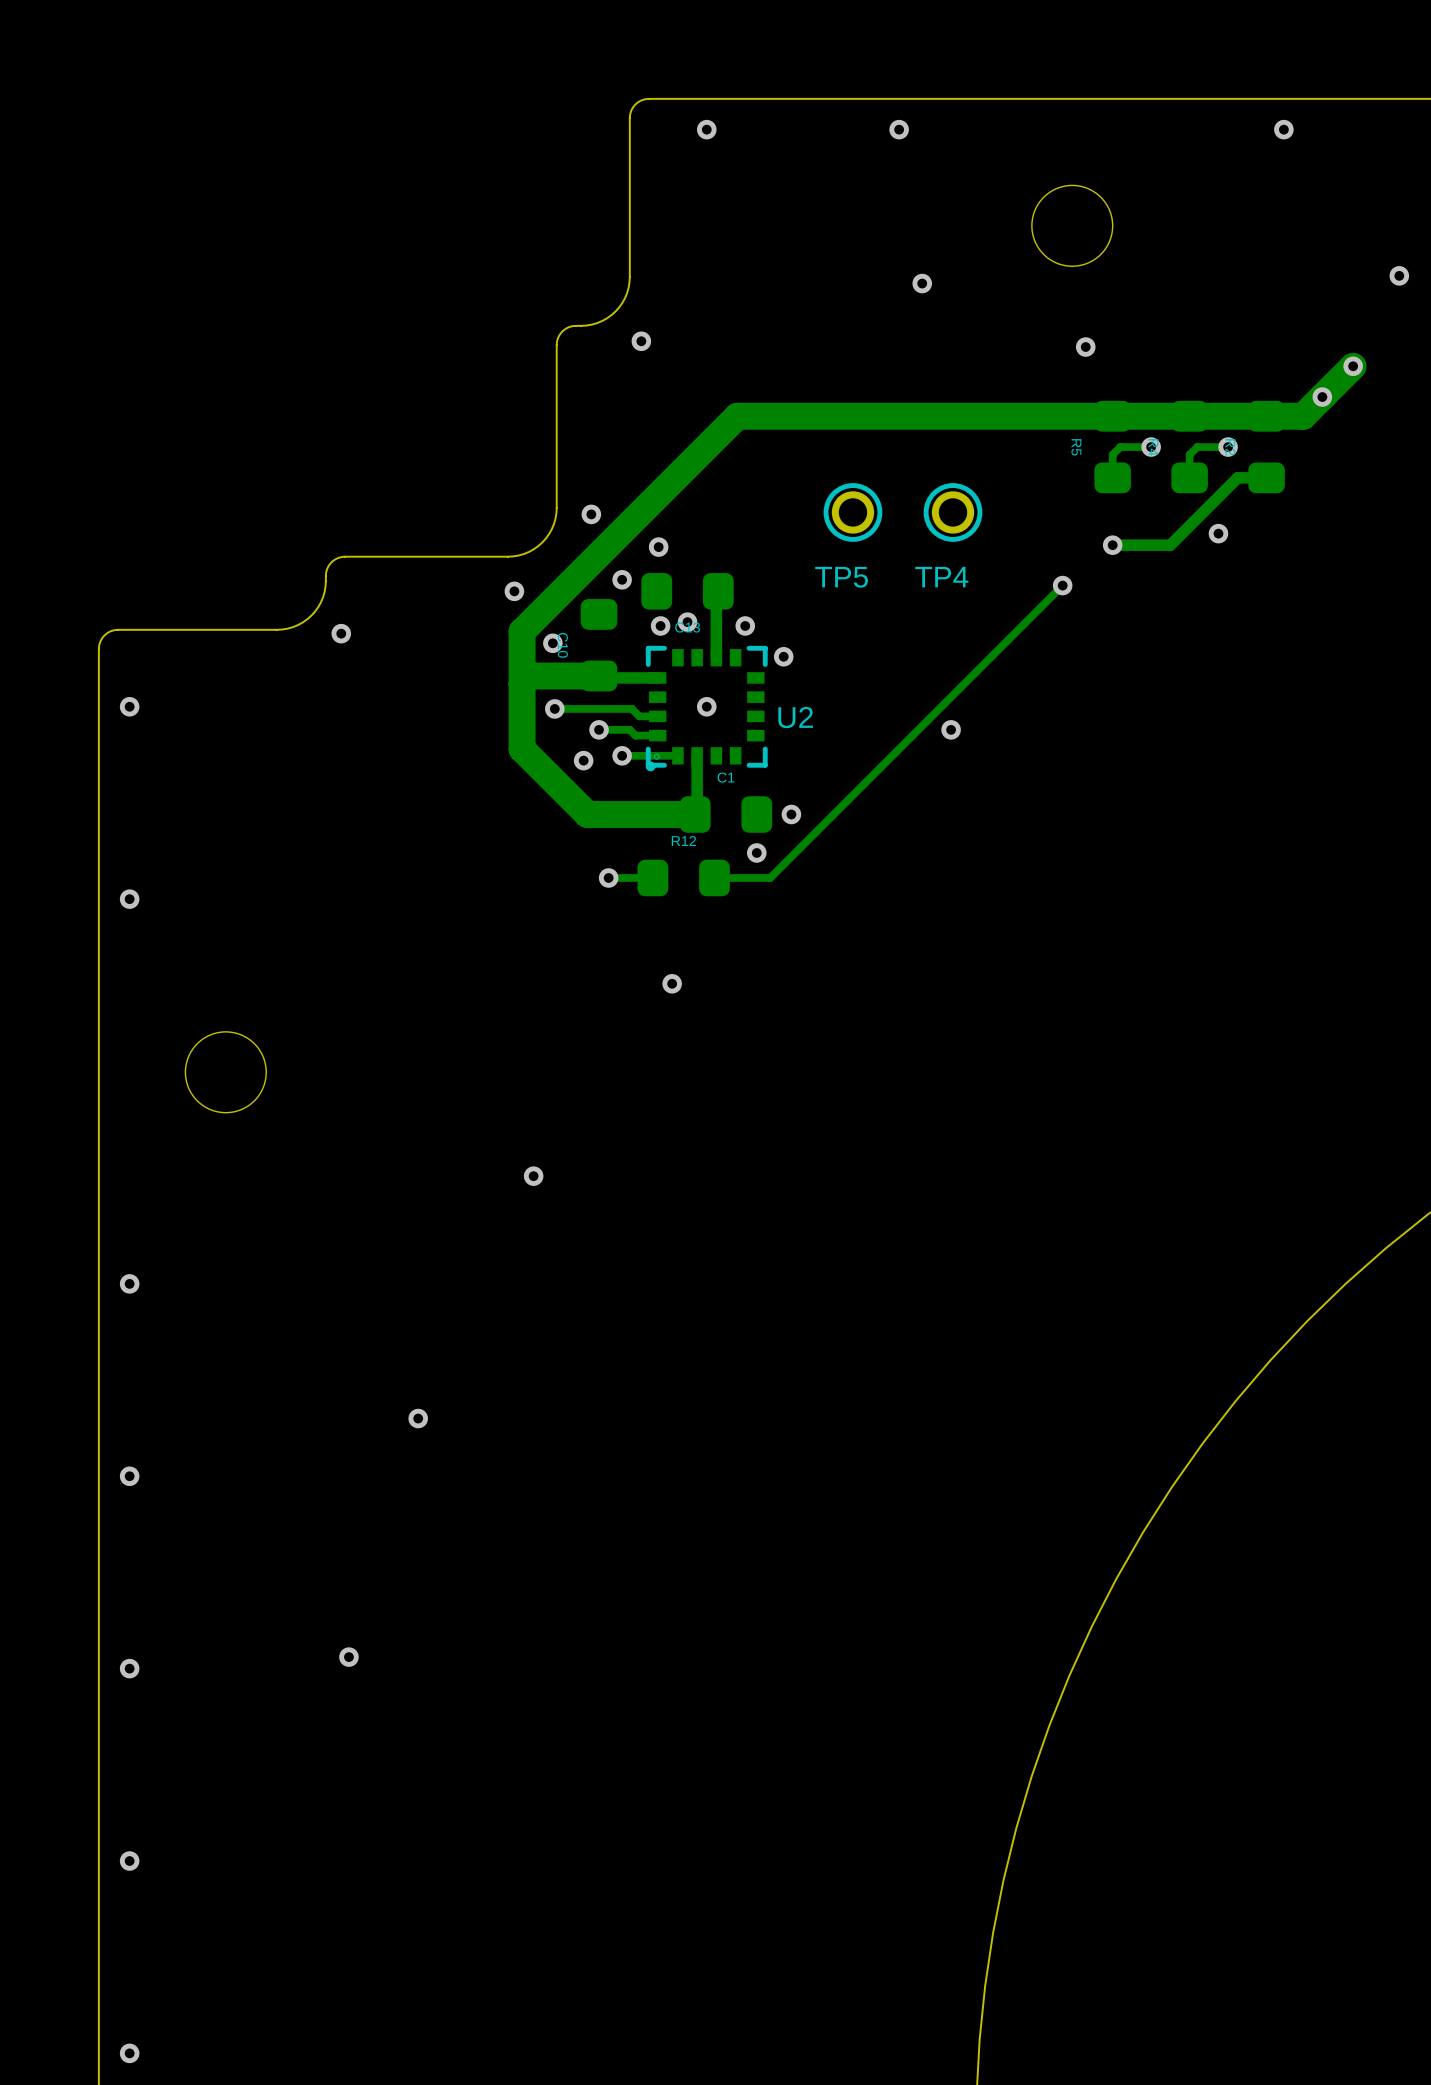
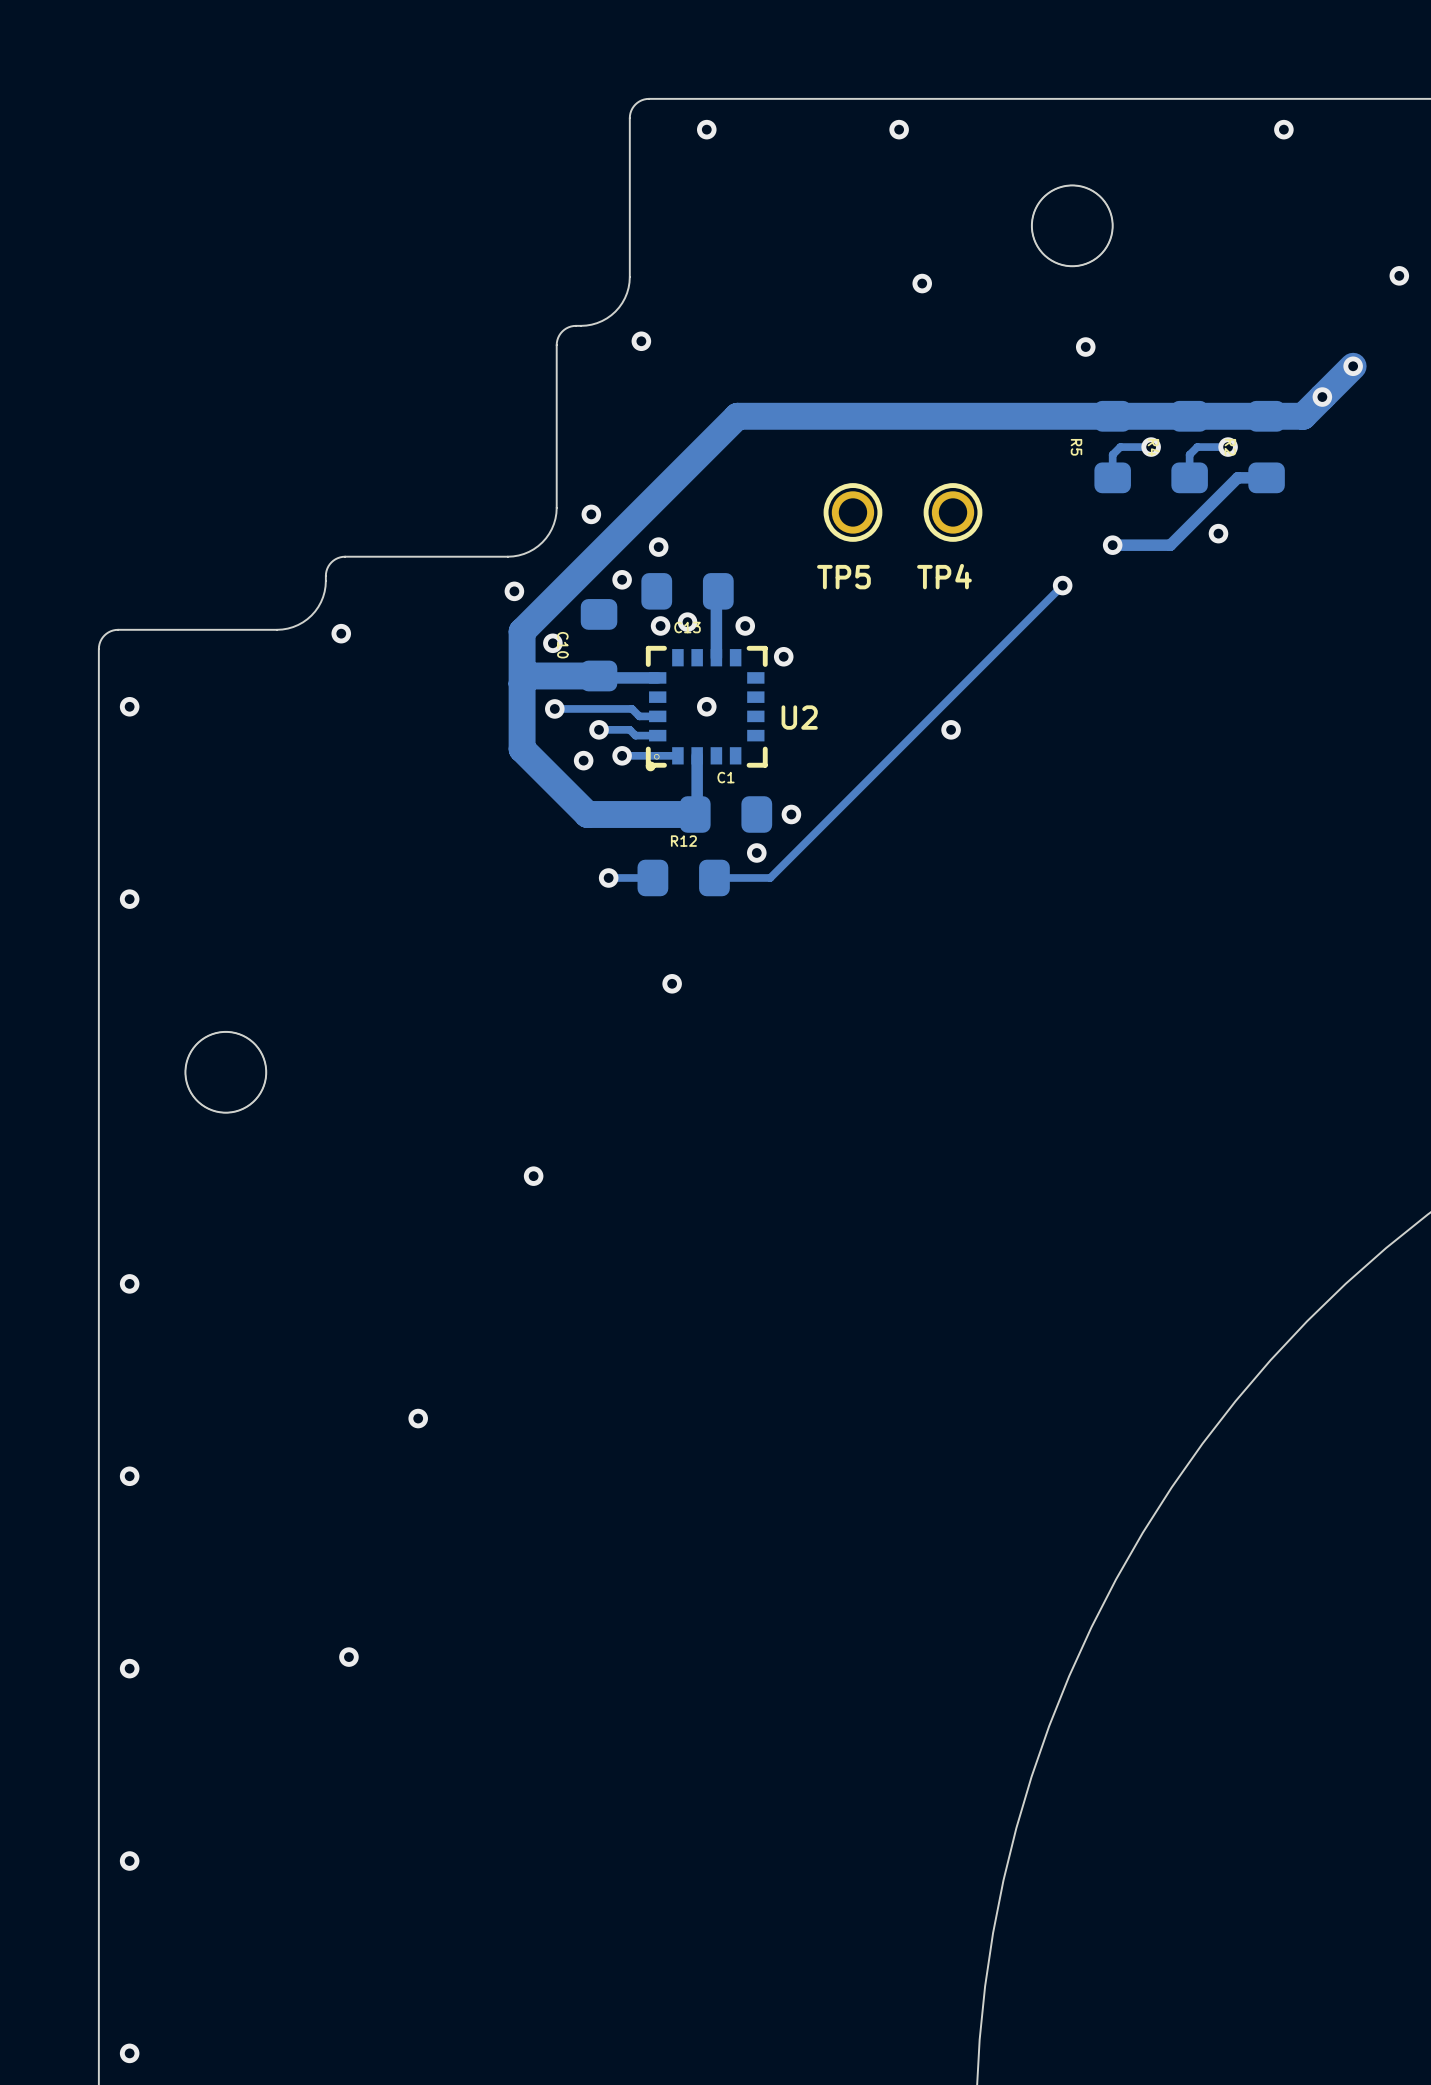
round board edge: none -> [1030, 184, 1114, 268]
round board edge: none -> [184, 1030, 268, 1114]

